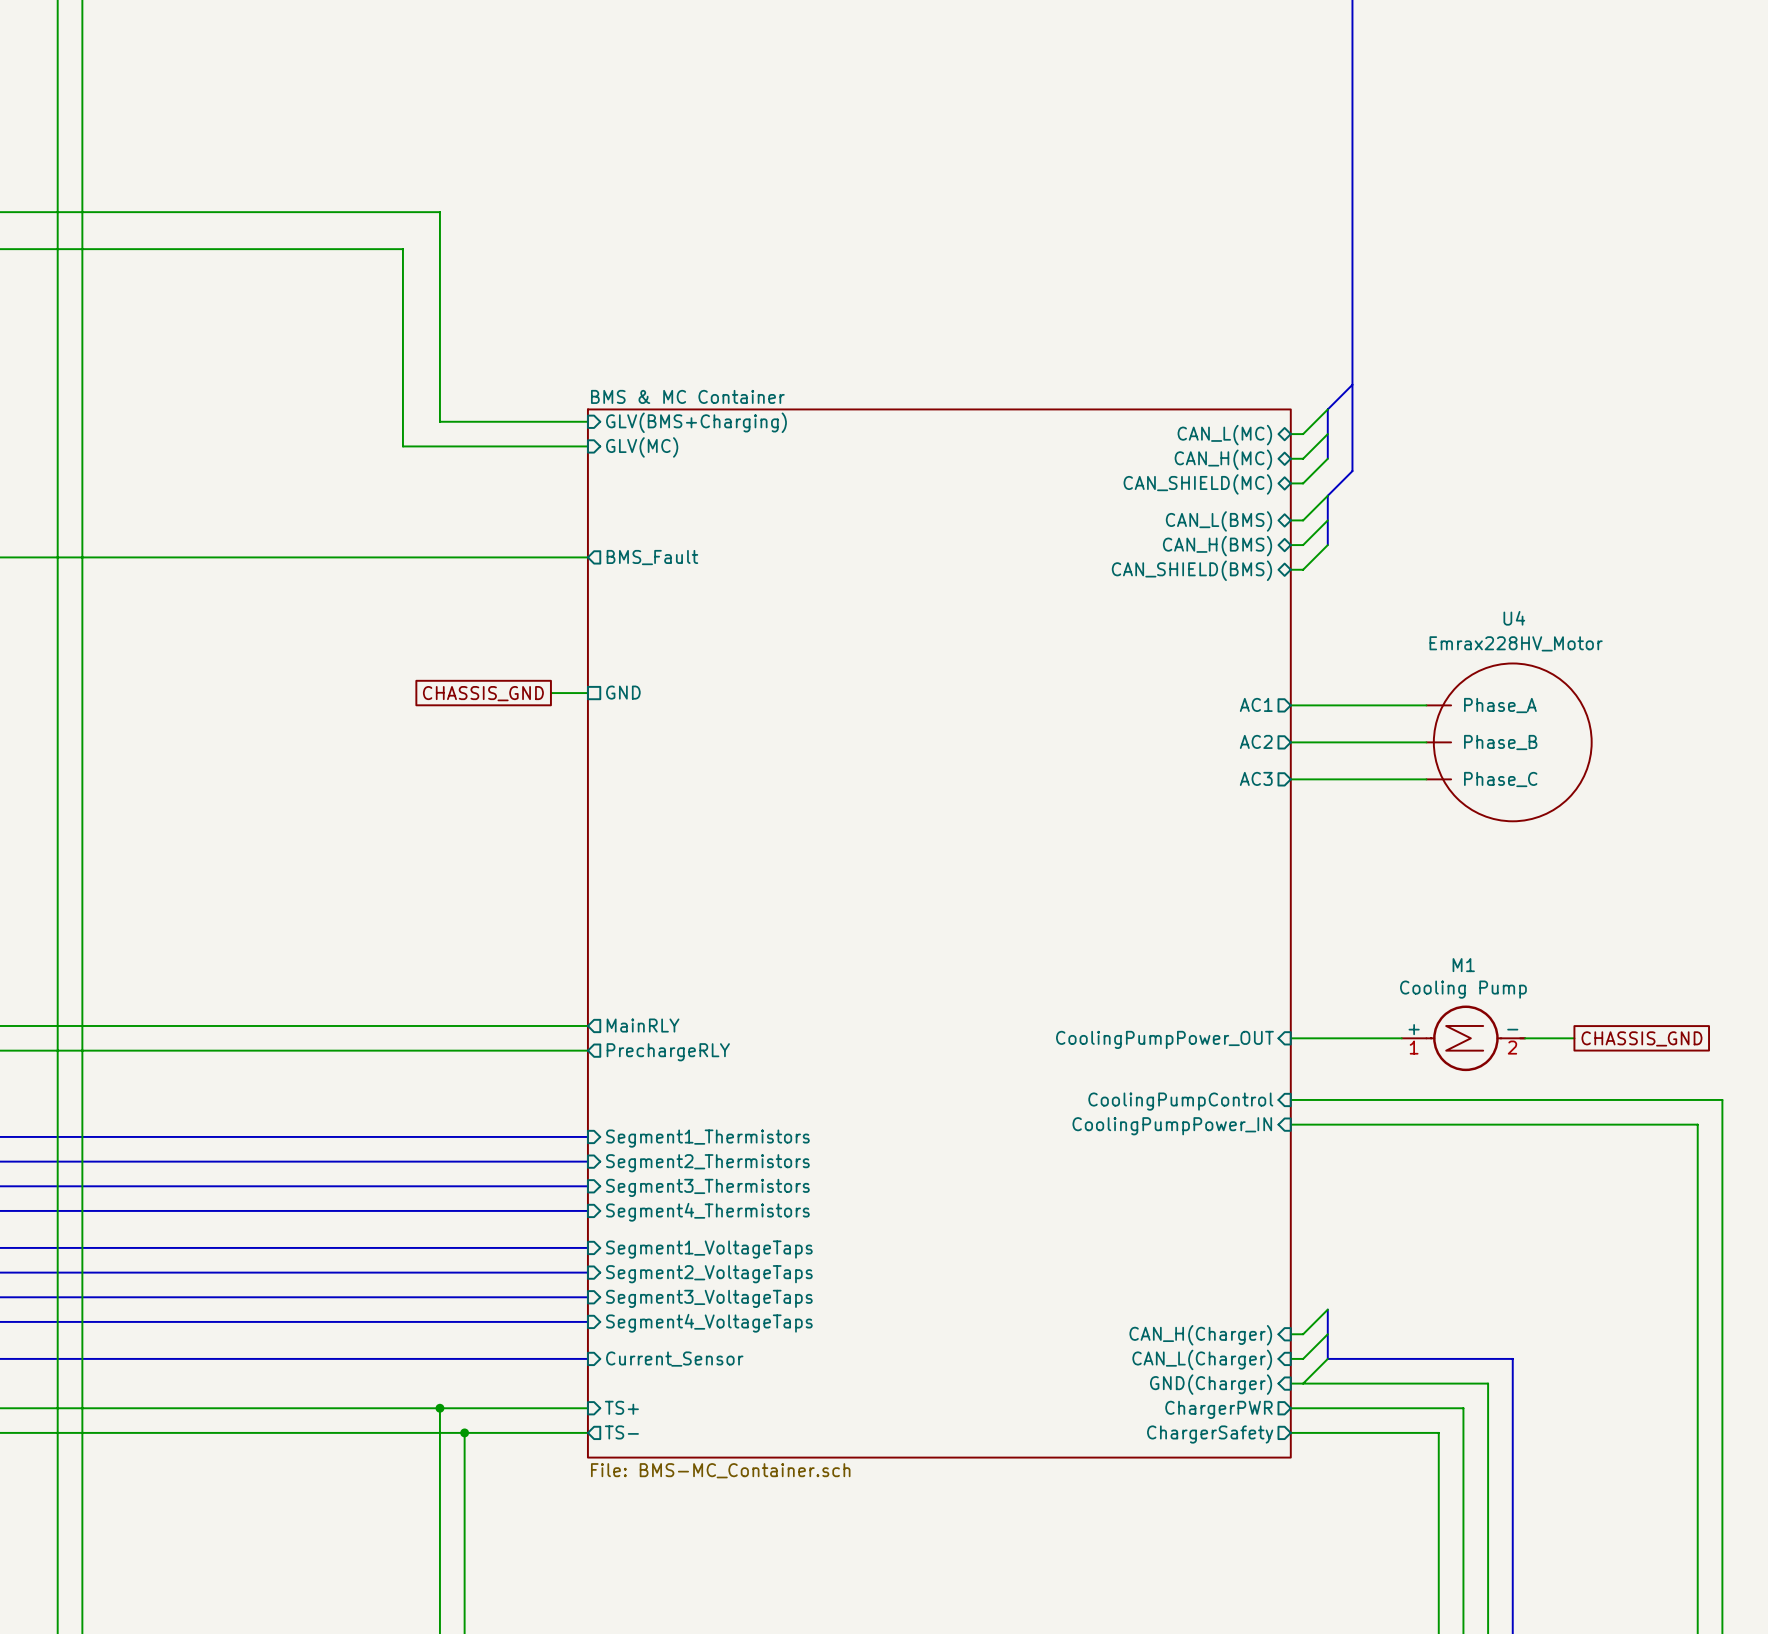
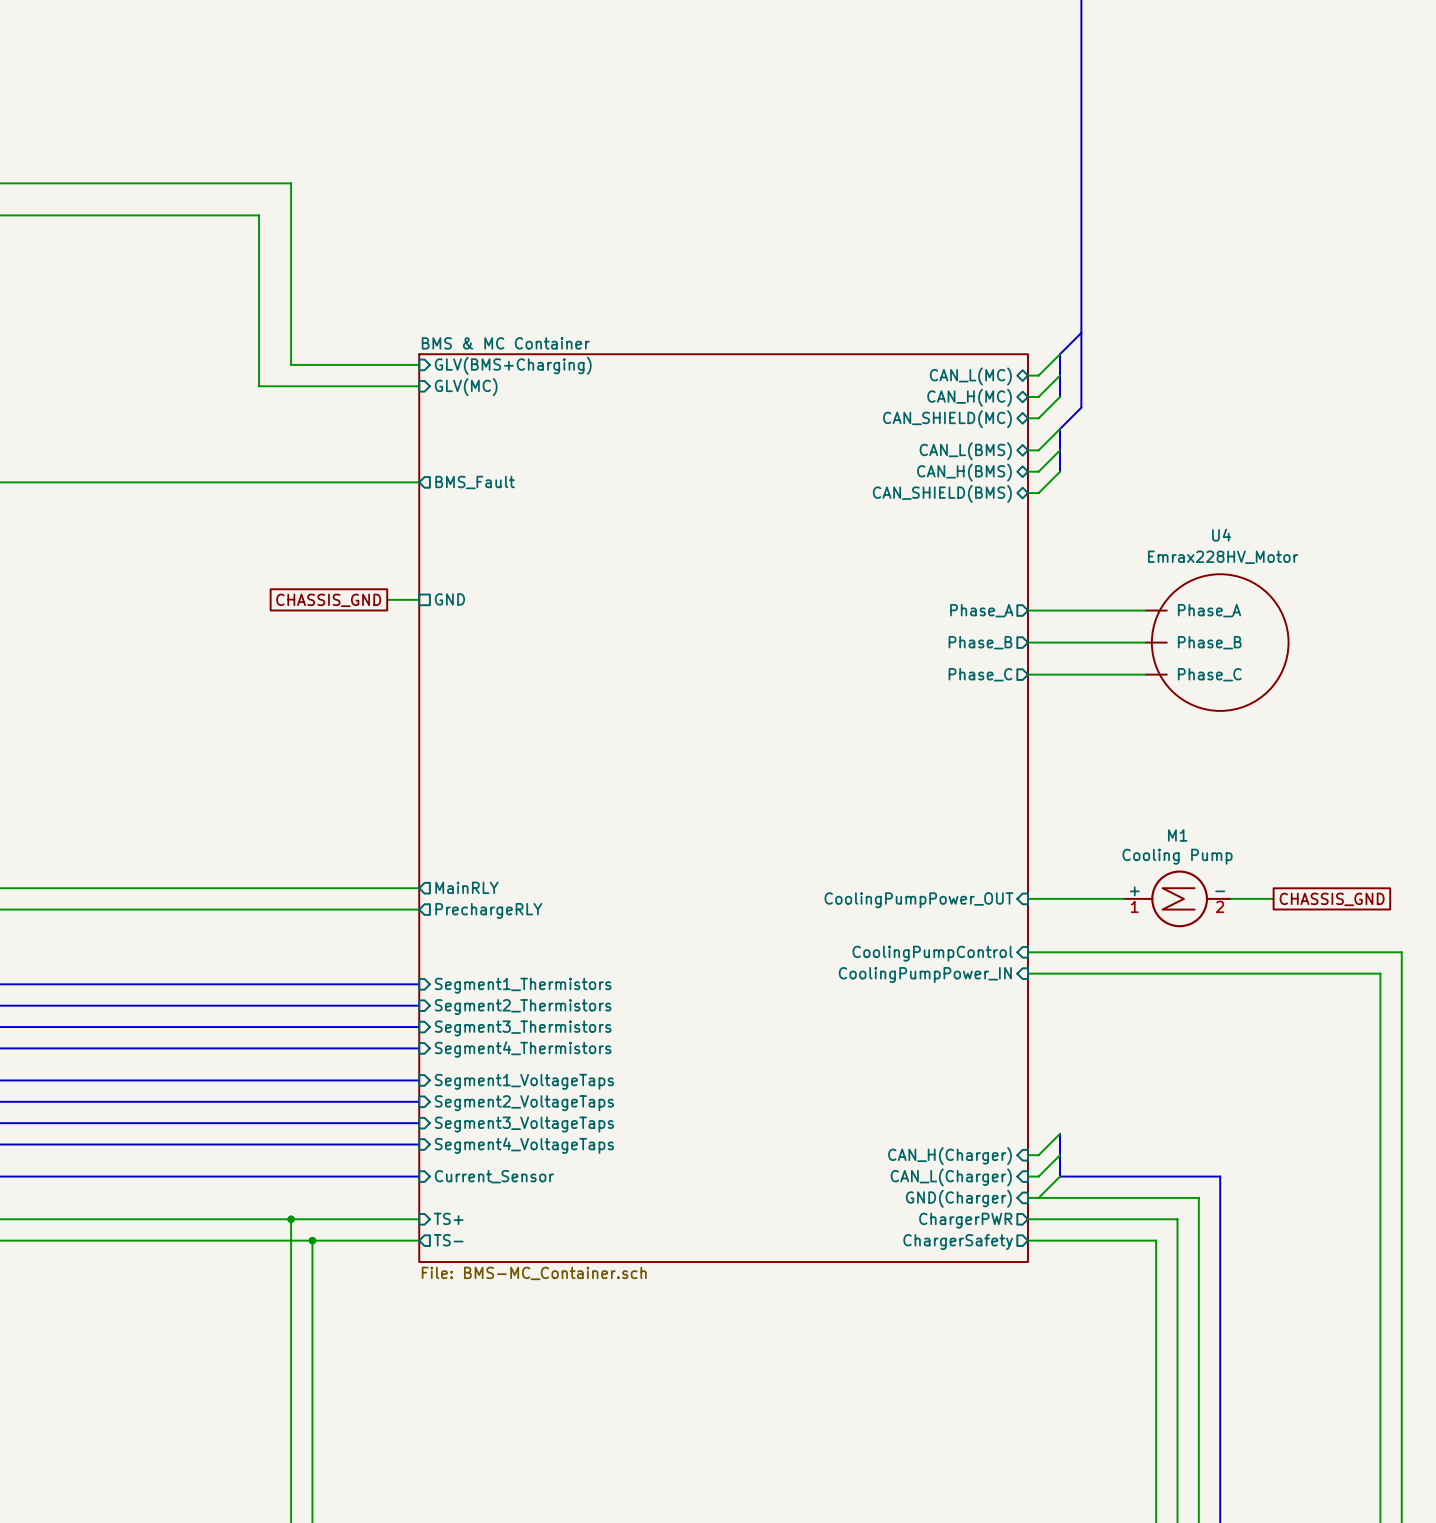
sheet pin: AC1 (1256, 704) -> Phase_A (981, 610)
sheet pin: AC2 (1256, 741) -> Phase_B (980, 642)
sheet pin: AC3 (1256, 778) -> Phase_C (980, 674)

